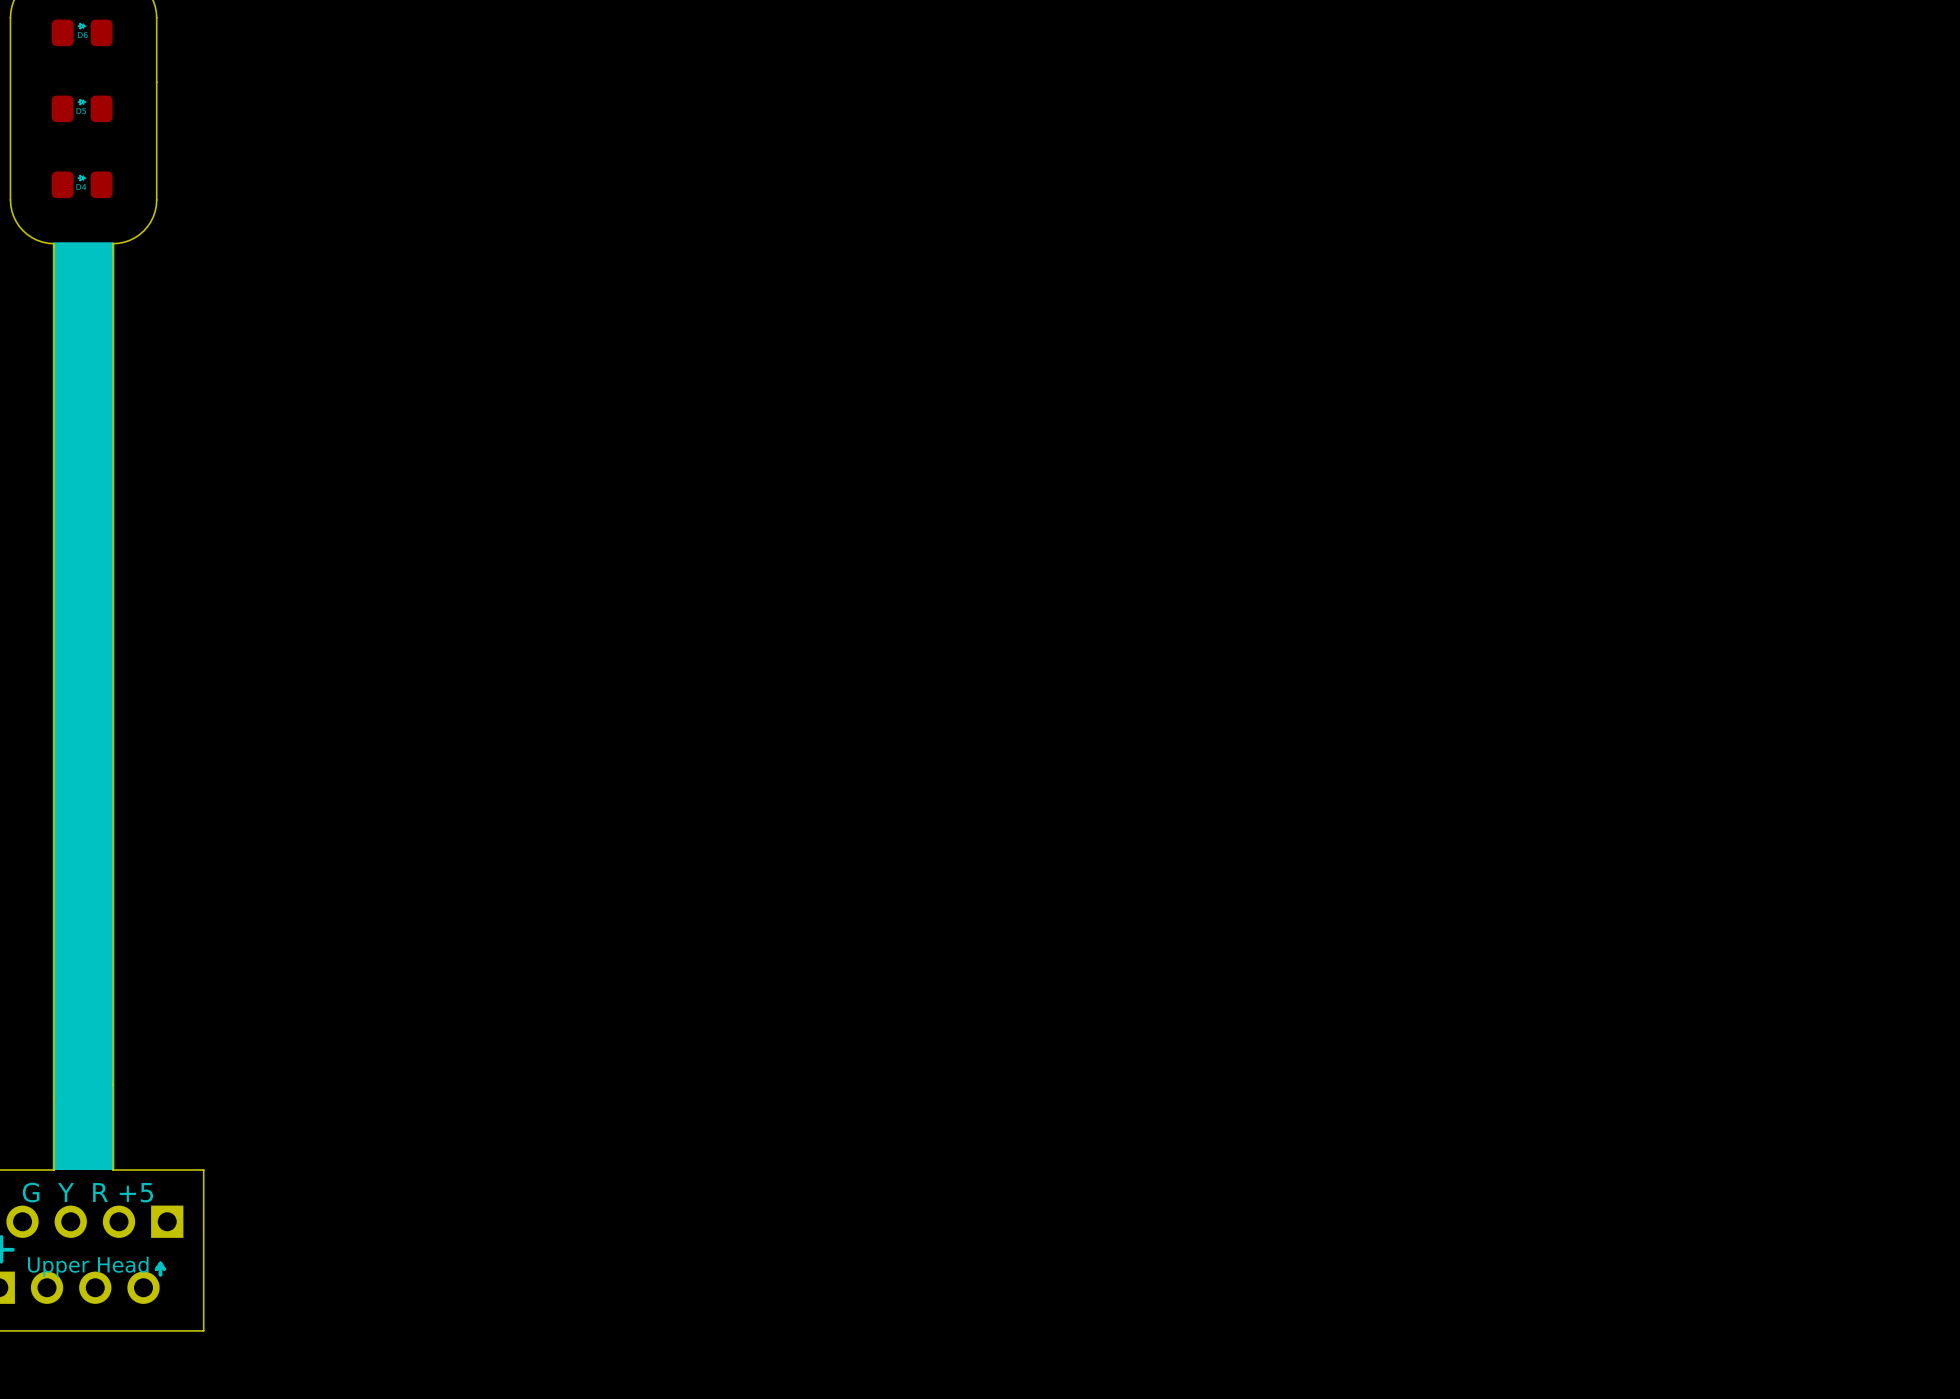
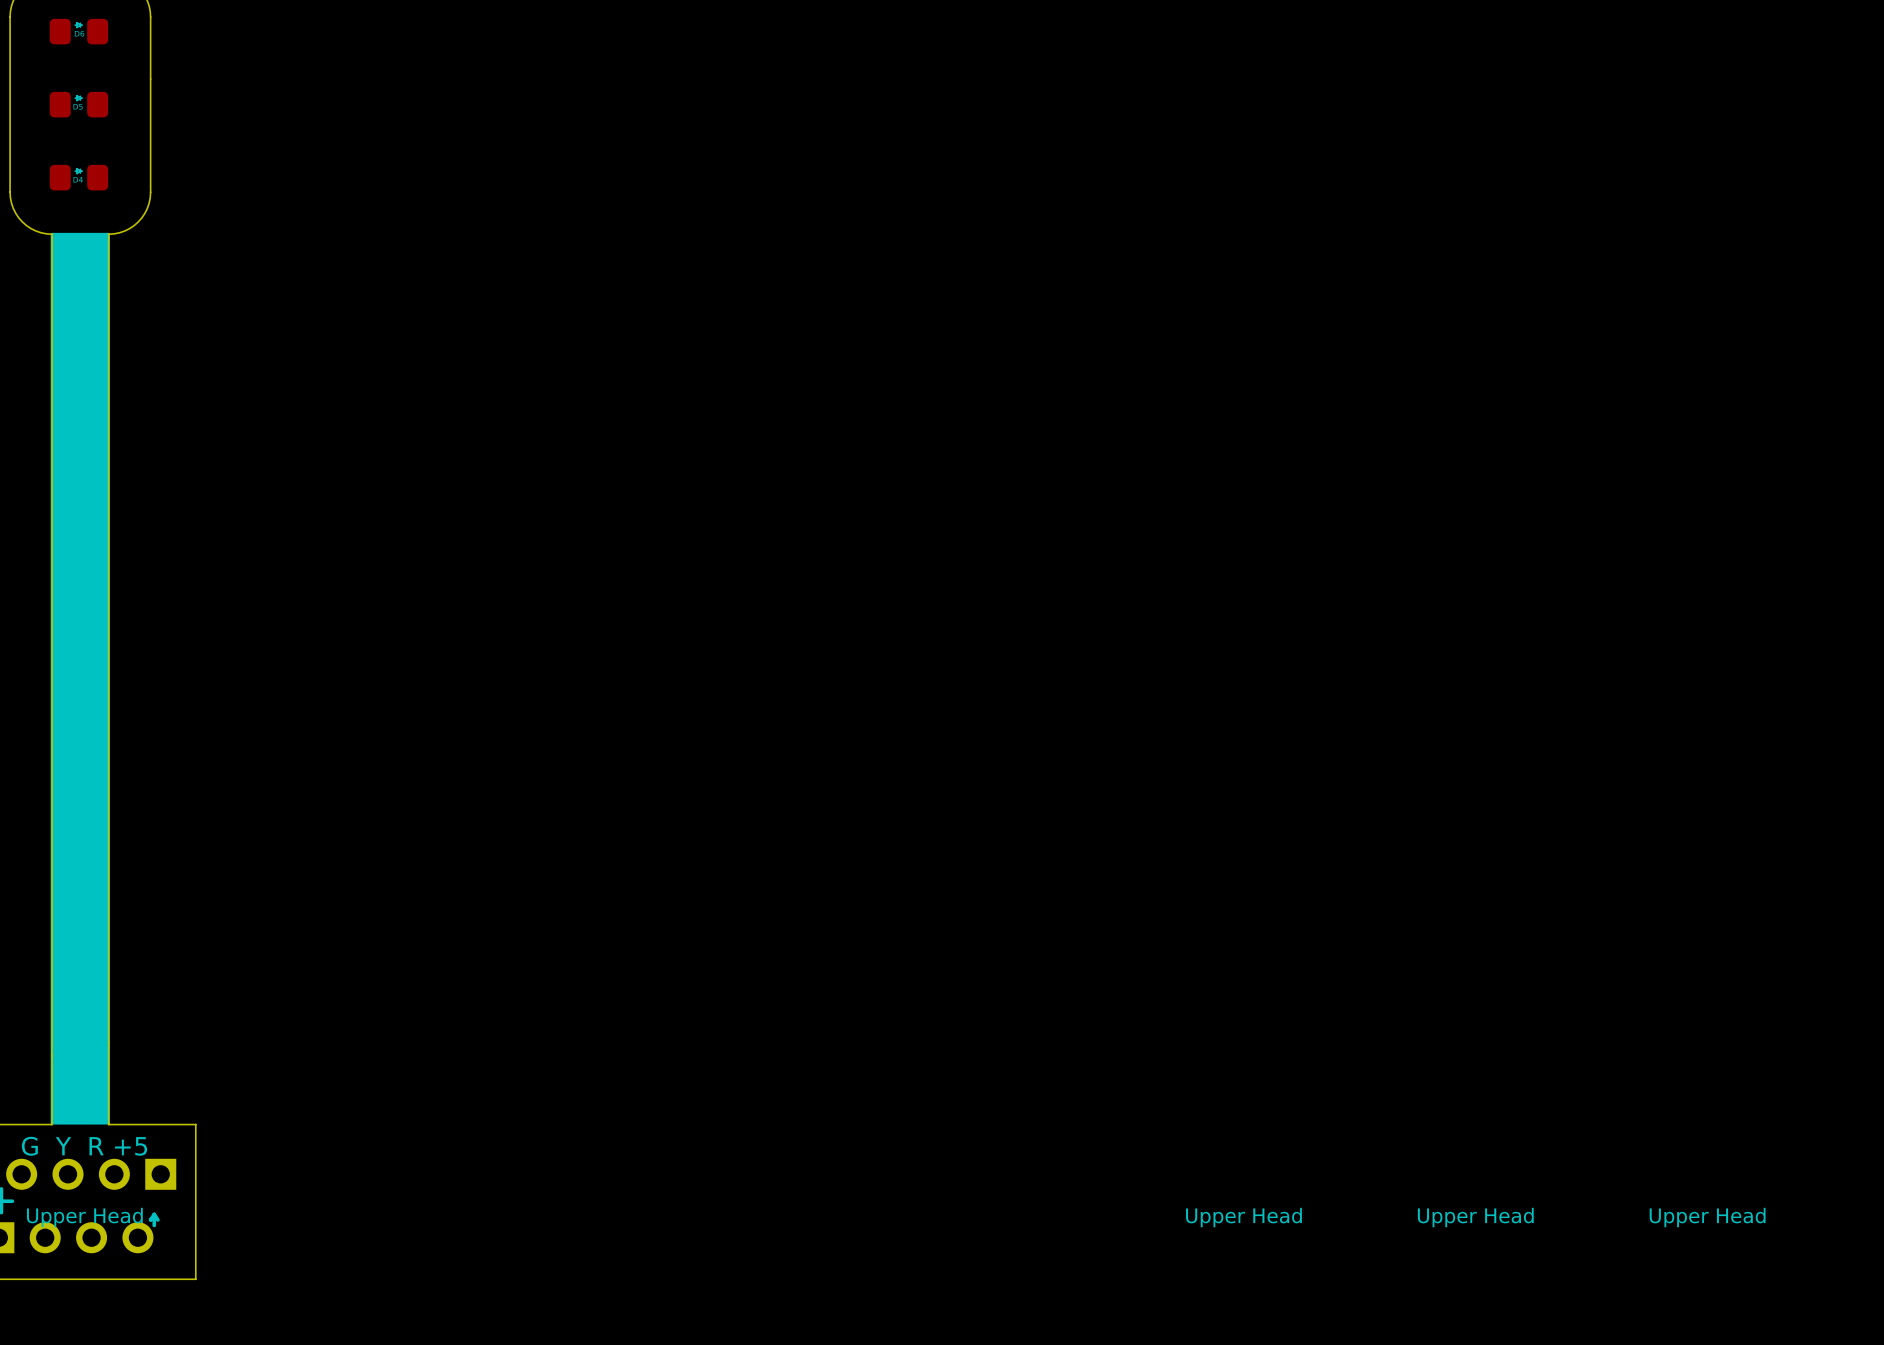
text: none -> Upper Head (1243, 1217)
text: none -> Upper Head (1475, 1217)
text: none -> Upper Head (1707, 1217)

